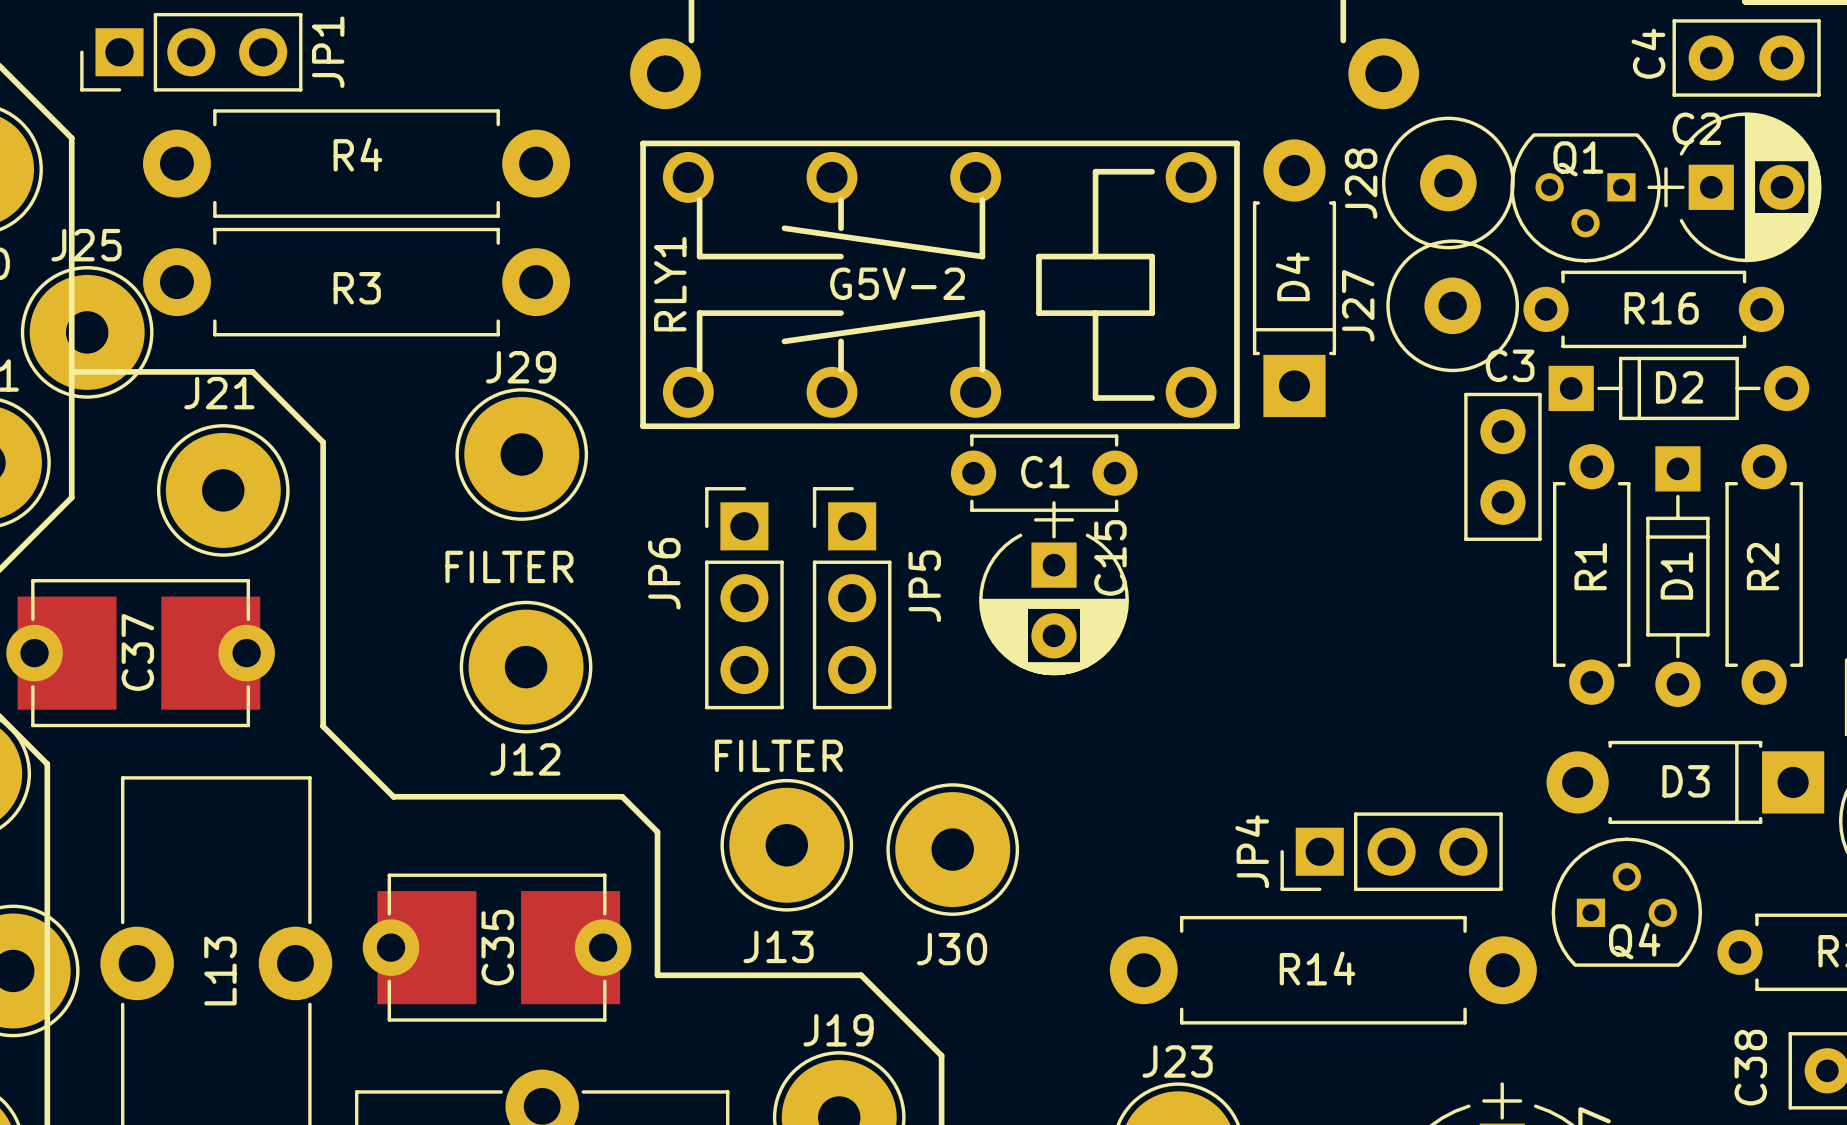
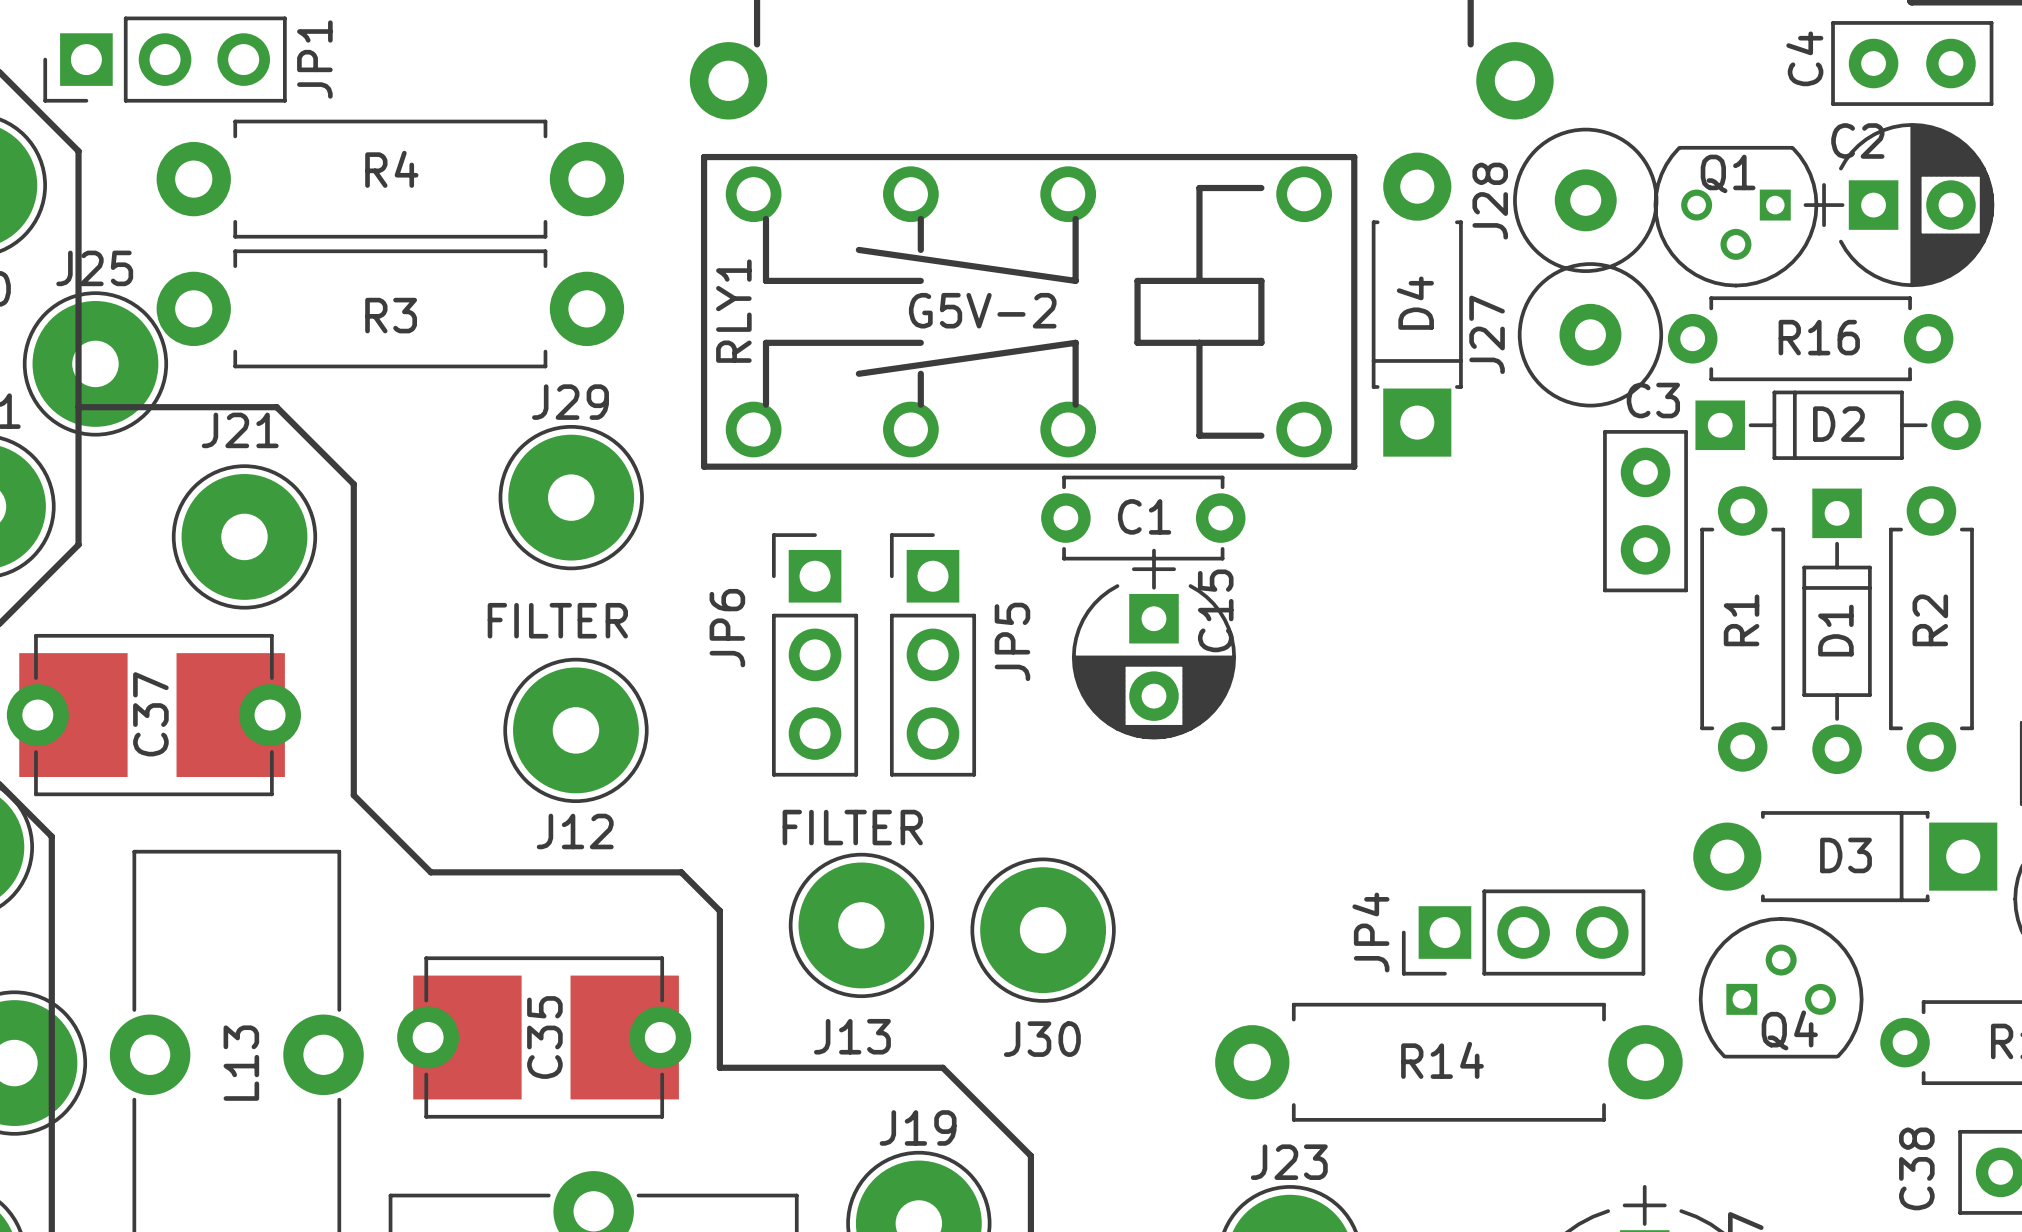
JP1 position: (191, 52) -> (165, 59)

